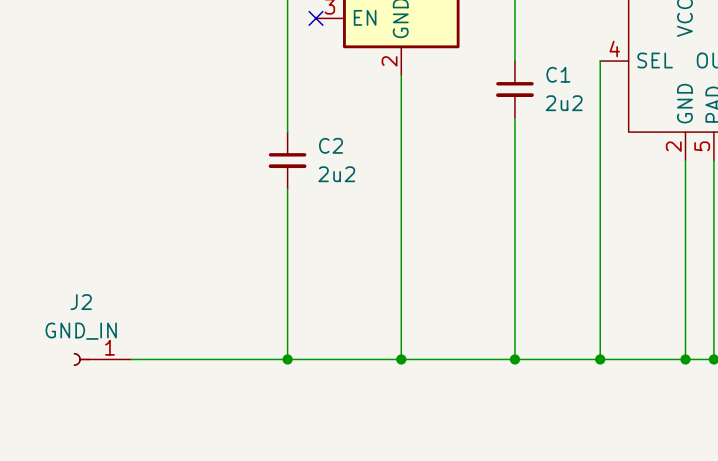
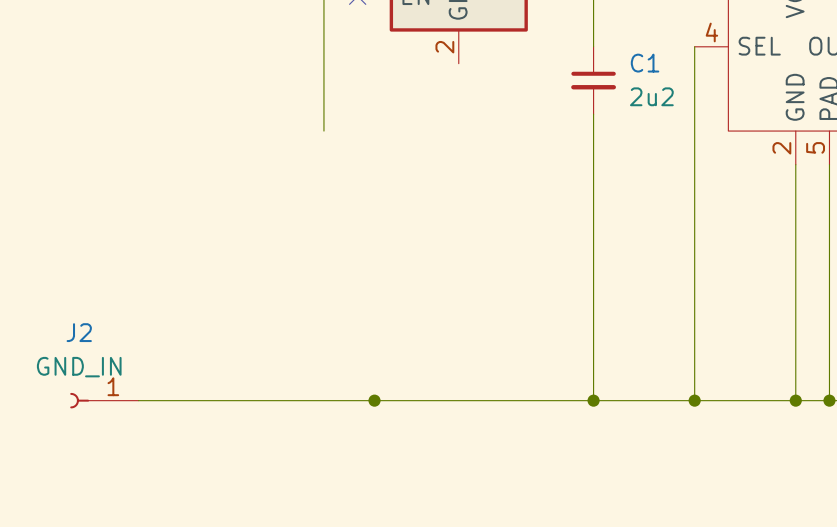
wire: (401, 75) (401, 359) -> none
C2: 2u2 (287, 160) -> none
wire: (287, 188) (287, 359) -> none
junction: (287, 359) -> none
junction: none -> (374, 400)
junction: (401, 359) -> none

